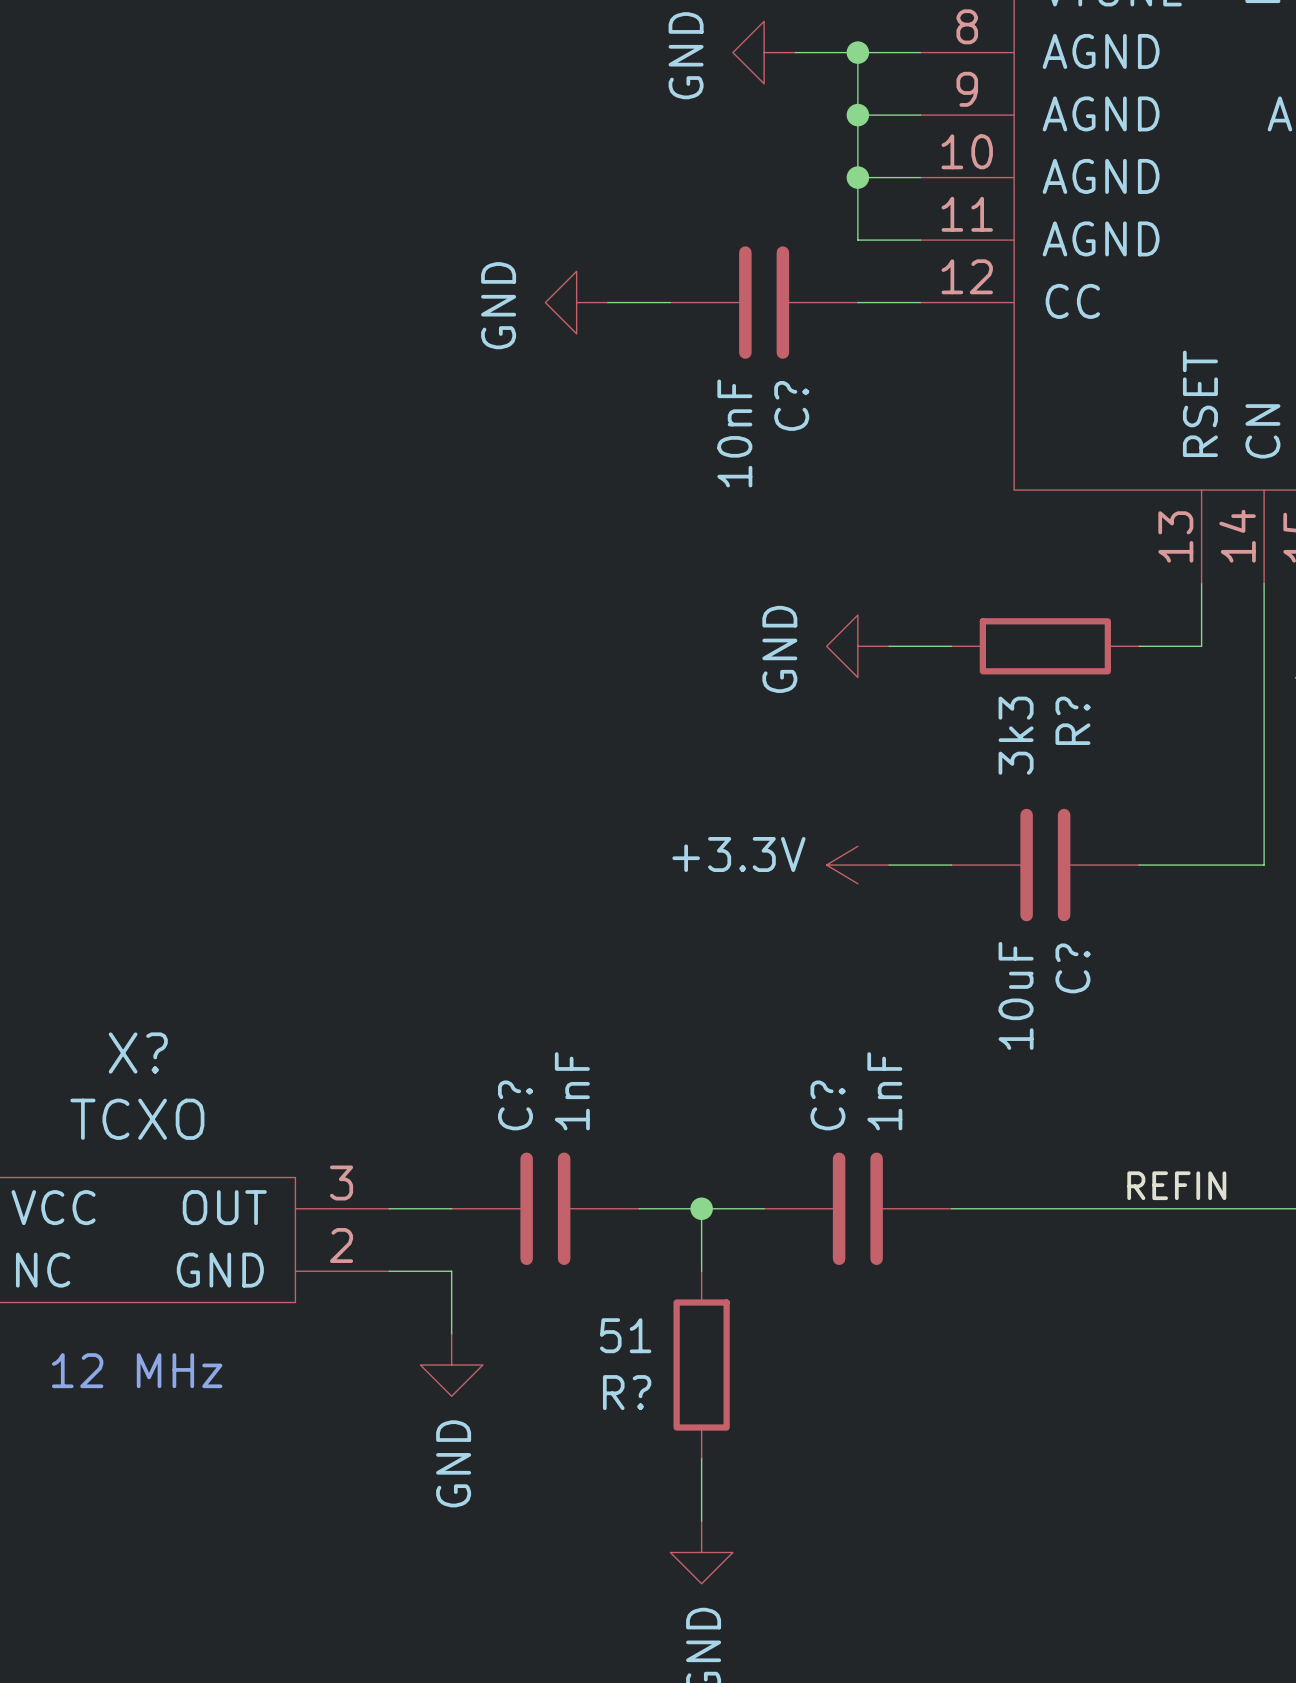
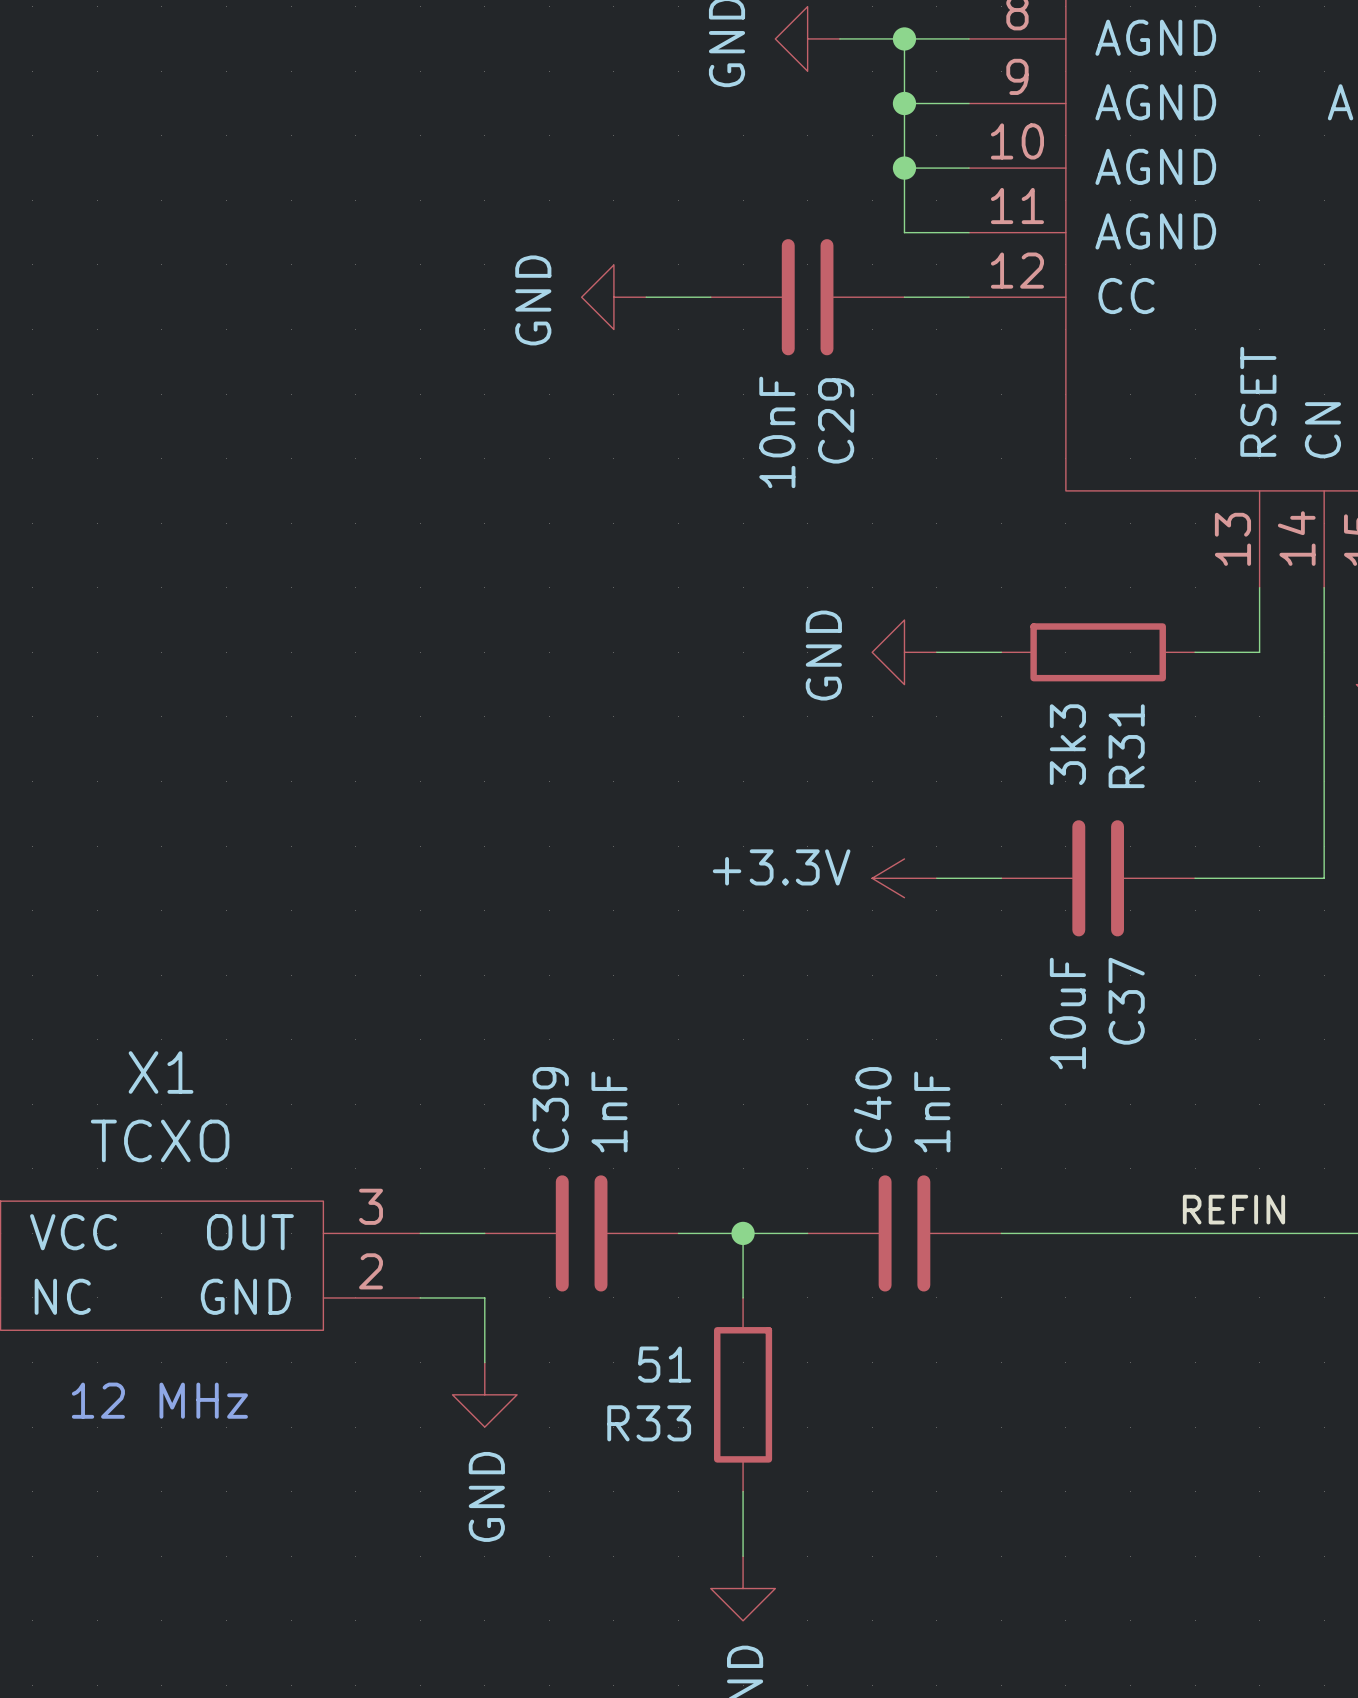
C? name: C? (791, 405) -> C29 (836, 420)
R? name: R? (1072, 720) -> R31 (1126, 746)
C? name: C? (1072, 968) -> C37 (1126, 1001)
X? name: X? (138, 1053) -> X1 (161, 1072)
C? name: C? (515, 1105) -> C39 (550, 1109)
C? name: C? (827, 1105) -> C40 (872, 1109)
R? name: R? (627, 1392) -> R33 (649, 1423)

